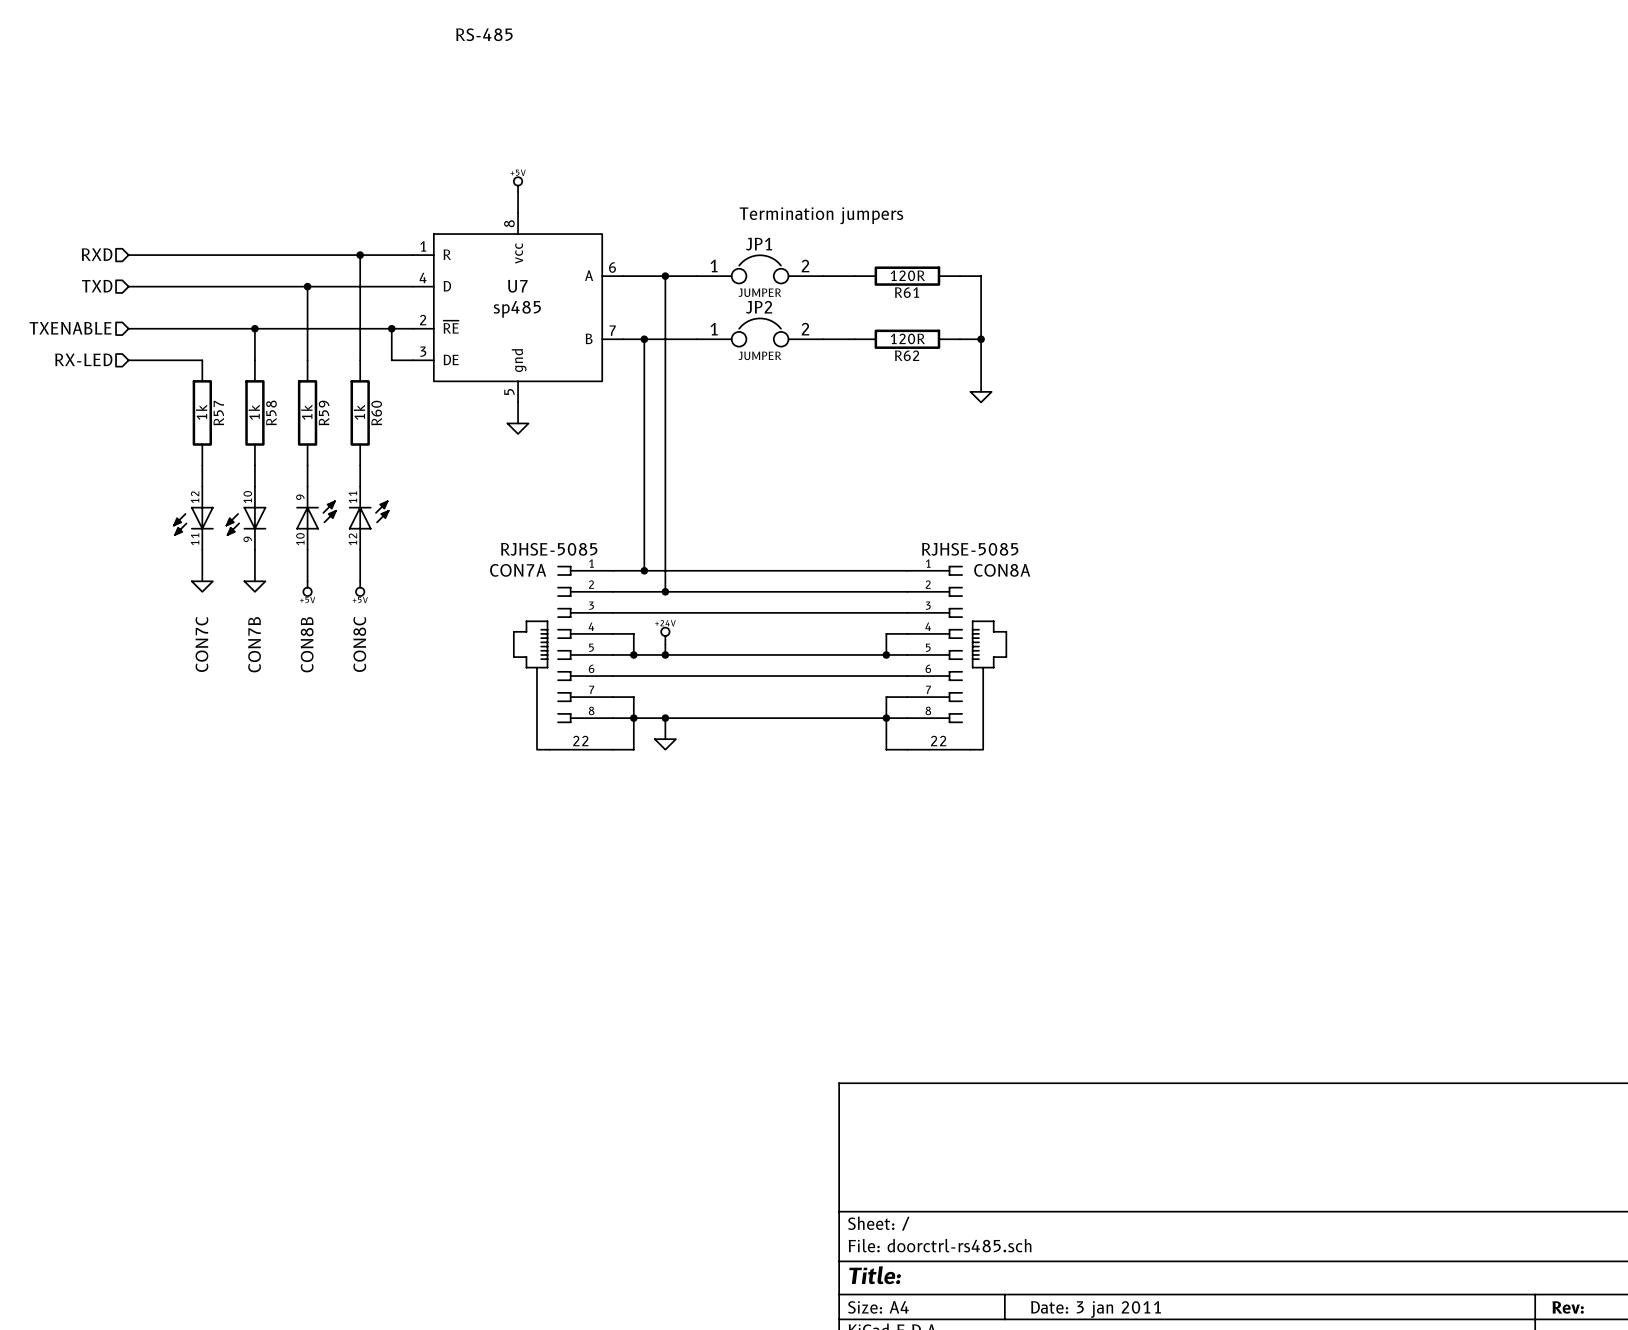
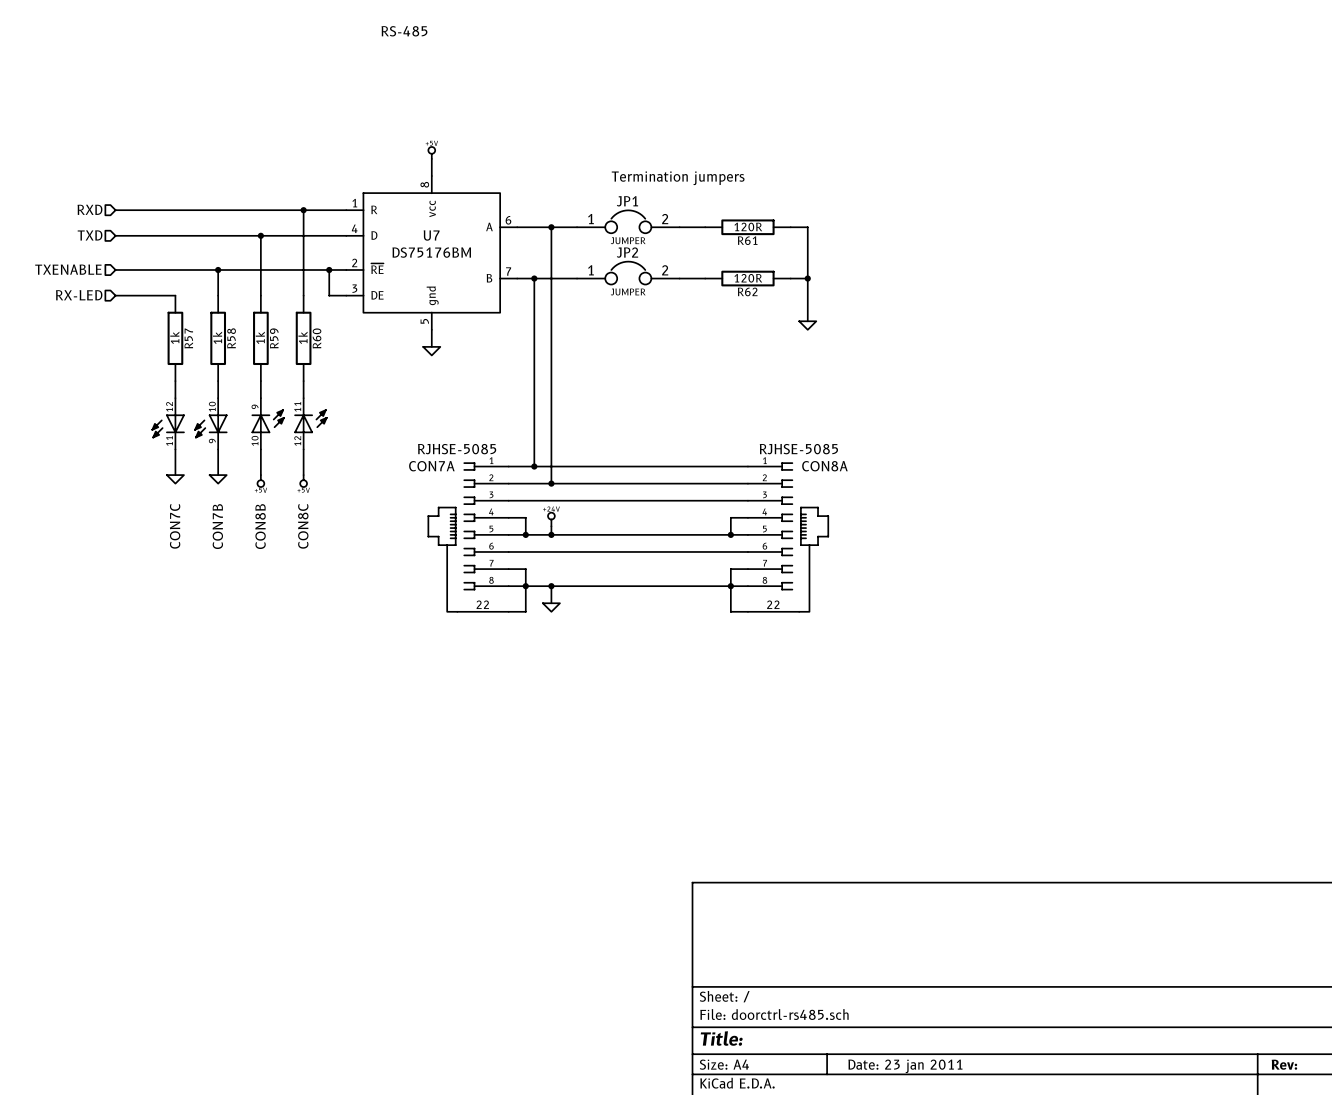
U7 value: sp485 (517, 309) -> DS75176BM (431, 252)
title block: Date: 3 jan 2011 (1096, 1309) -> Date: 23 jan 2011 (905, 1066)

